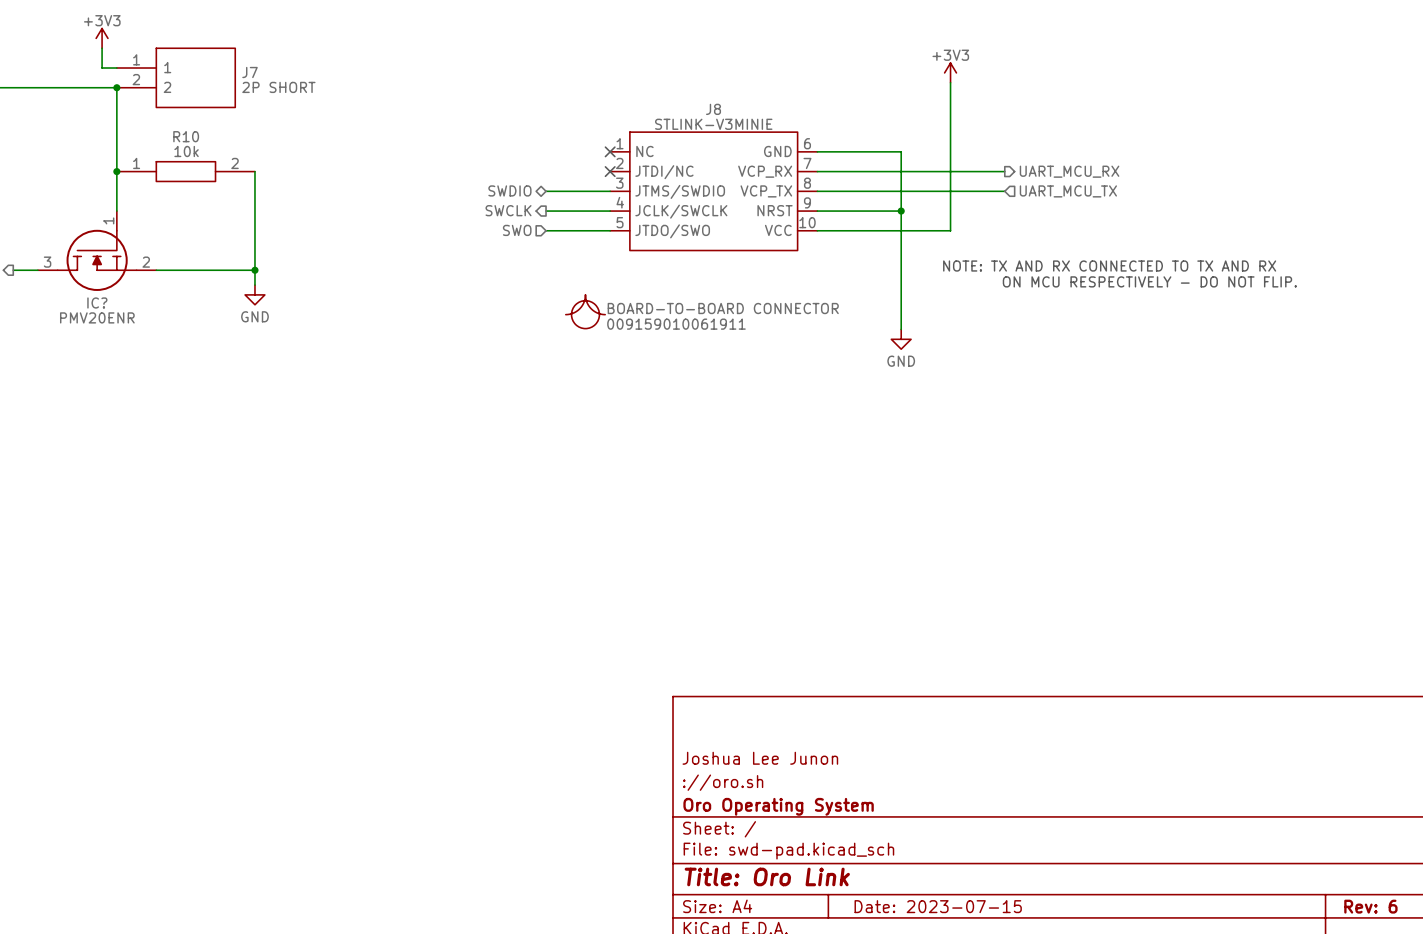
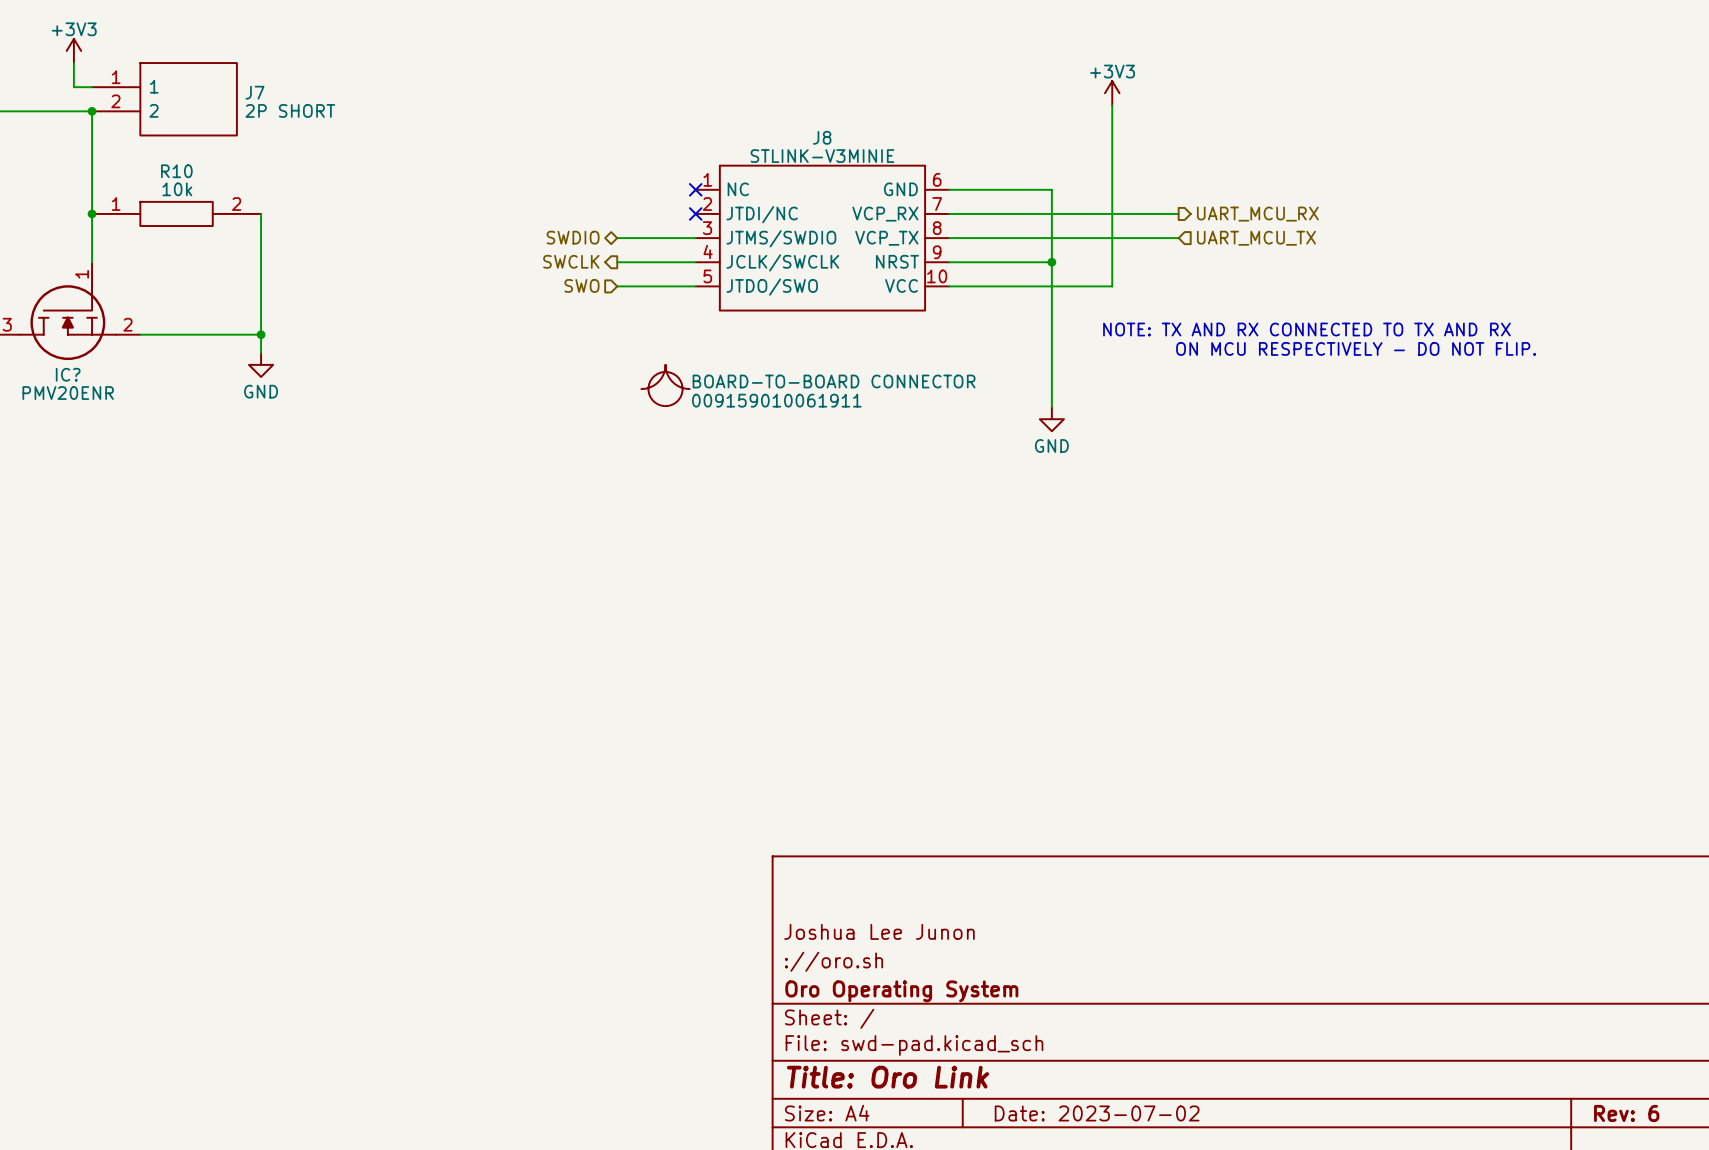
title block: Date: 2023-07-15 (938, 906) -> Date: 2023-07-02 (1097, 1113)

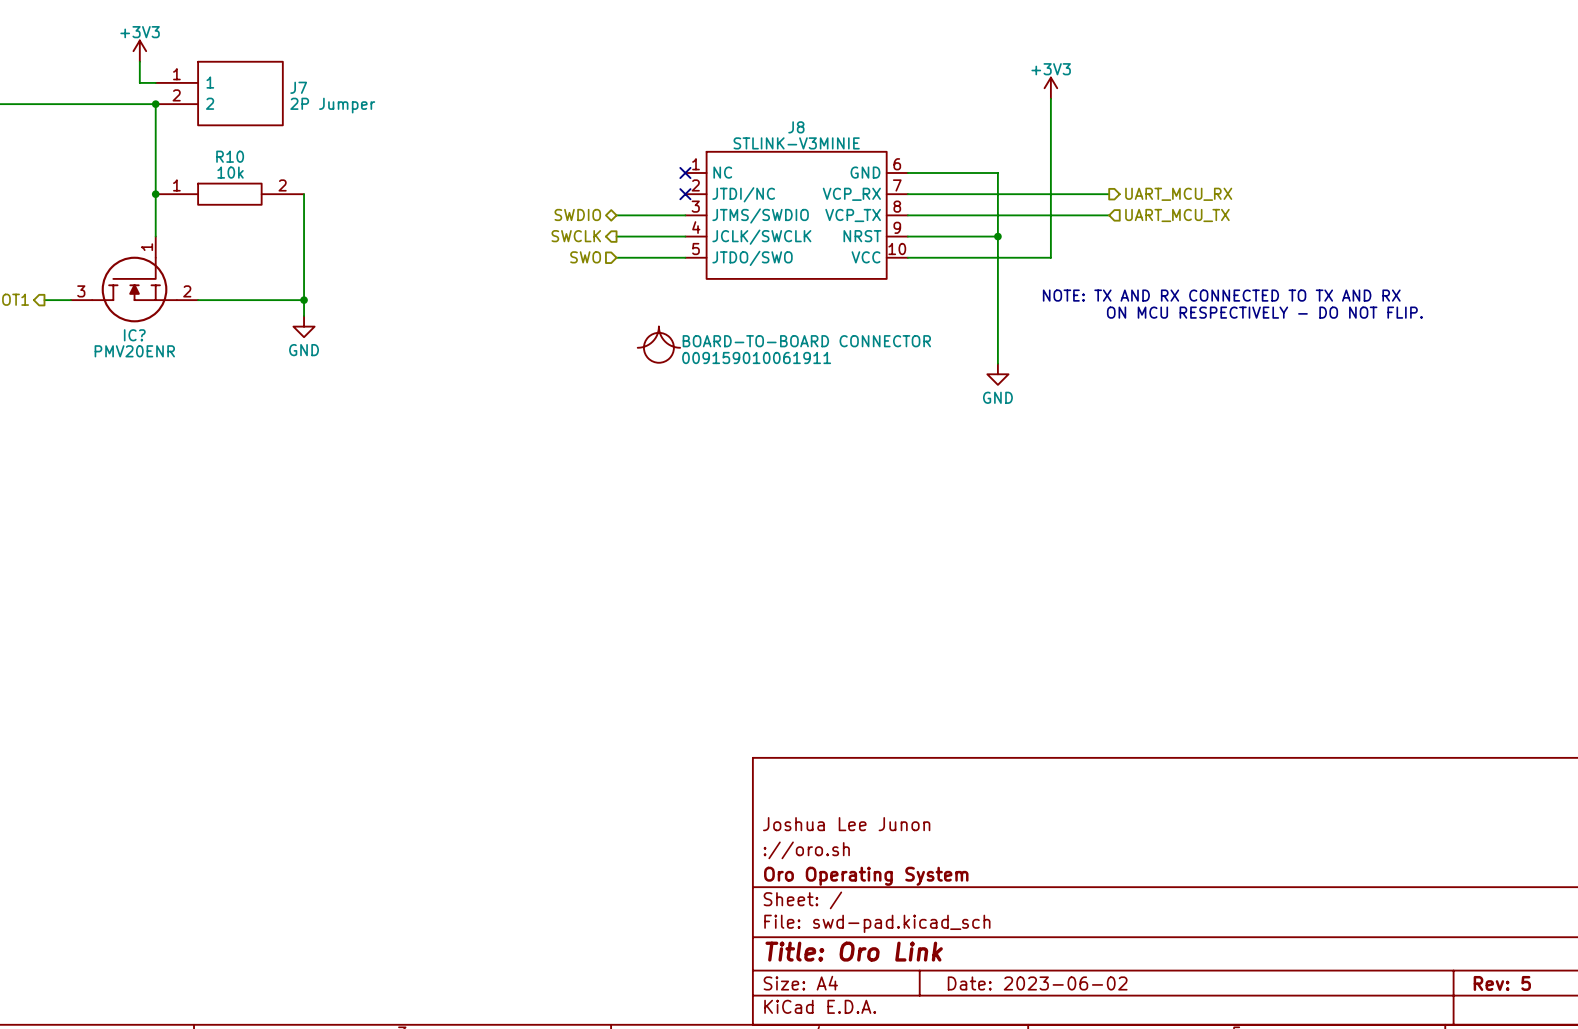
J7 value: 2P SHORT (290, 110) -> 2P Jumper (332, 105)
title block: Date: 2023-07-02 (1097, 1113) -> Date: 2023-06-02 (1037, 983)
title block: Rev: 6 (1626, 1113) -> Rev: 5 (1502, 983)

